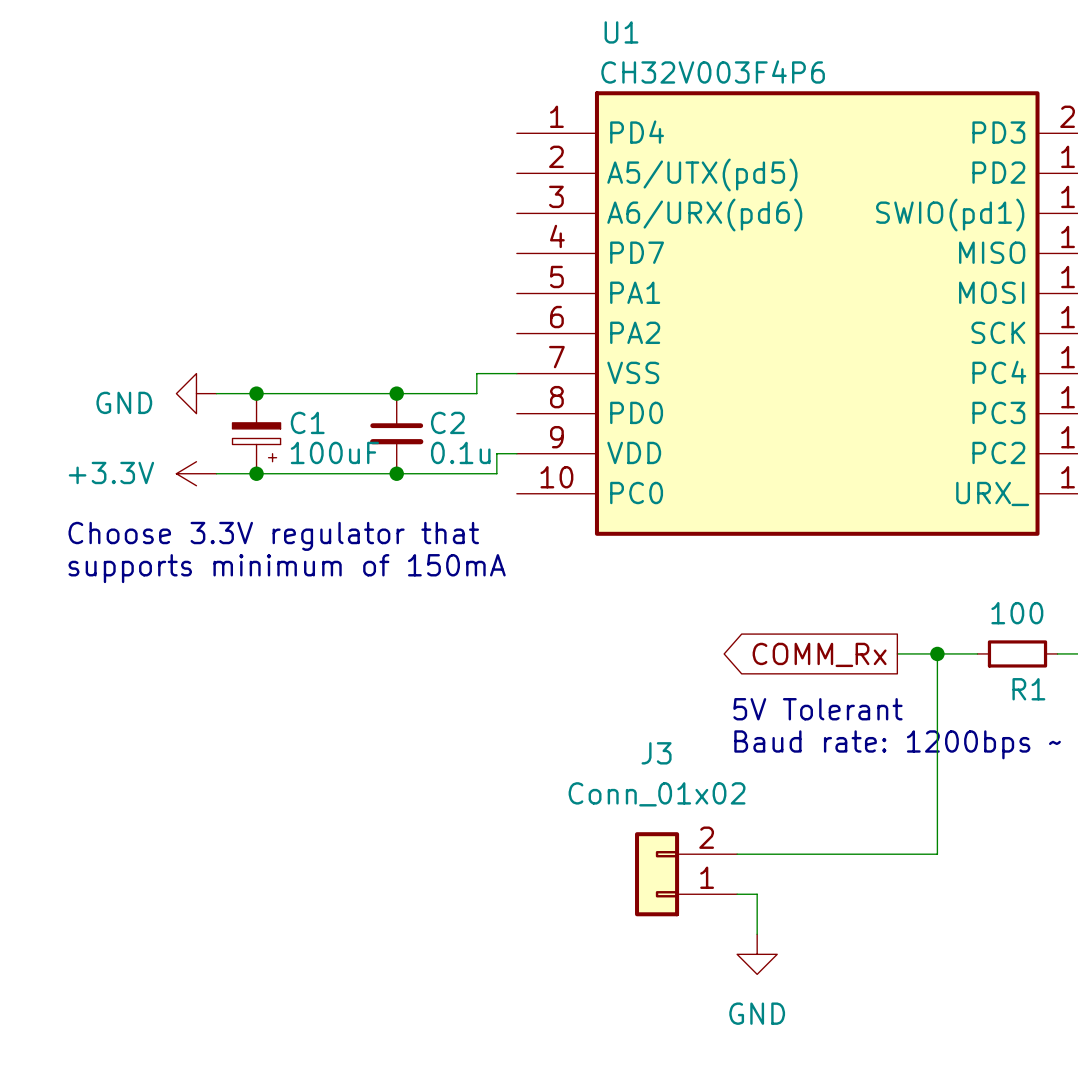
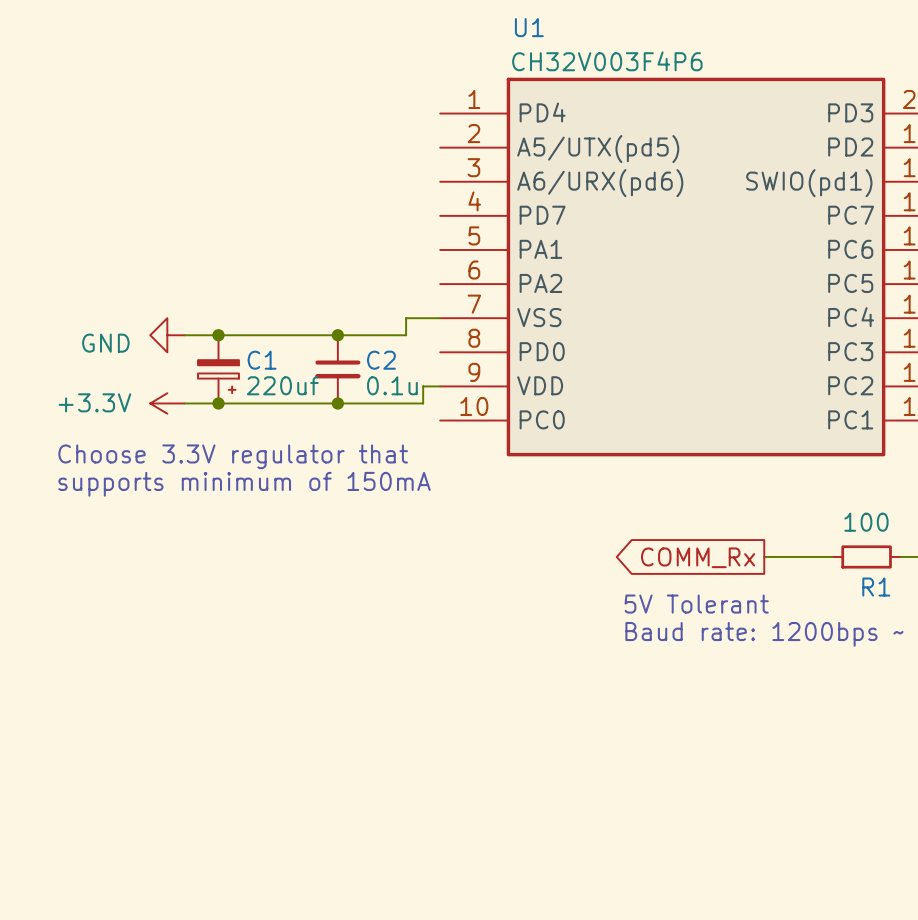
U1 pin name: MISO (992, 252) -> PC7 (851, 215)
U1 pin name: MOSI (991, 292) -> PC6 (850, 249)
U1 pin name: SCK (998, 332) -> PC5 (850, 283)
C1 value: 100uF (334, 452) -> 220uf (282, 385)
U1 pin name: URX_ (992, 493) -> PC1 (850, 419)
wire: (937, 653) (937, 854) (737, 854) -> none
junction: (937, 653) -> none
J3: Conn_01x02 (686, 874) -> none
wire: (737, 894) (757, 894) (757, 934) -> none
power symbol: GND (757, 954) -> none

